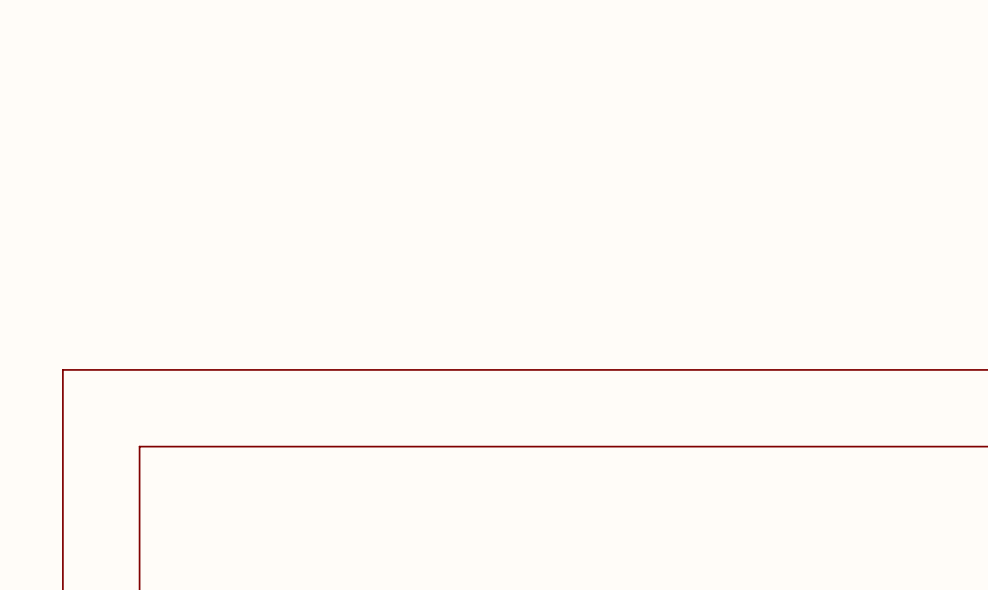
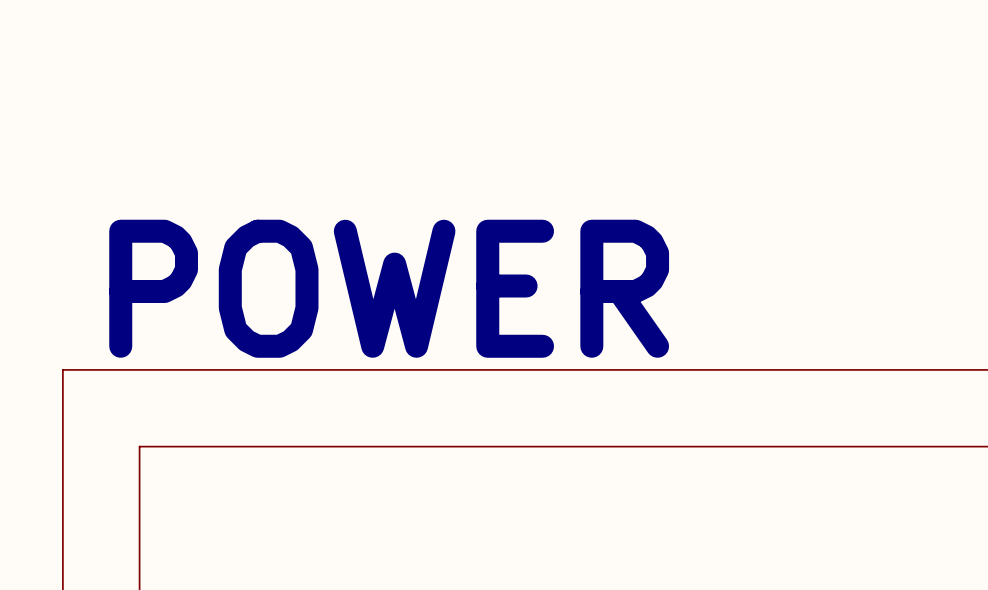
text: none -> POWER (389, 288)

